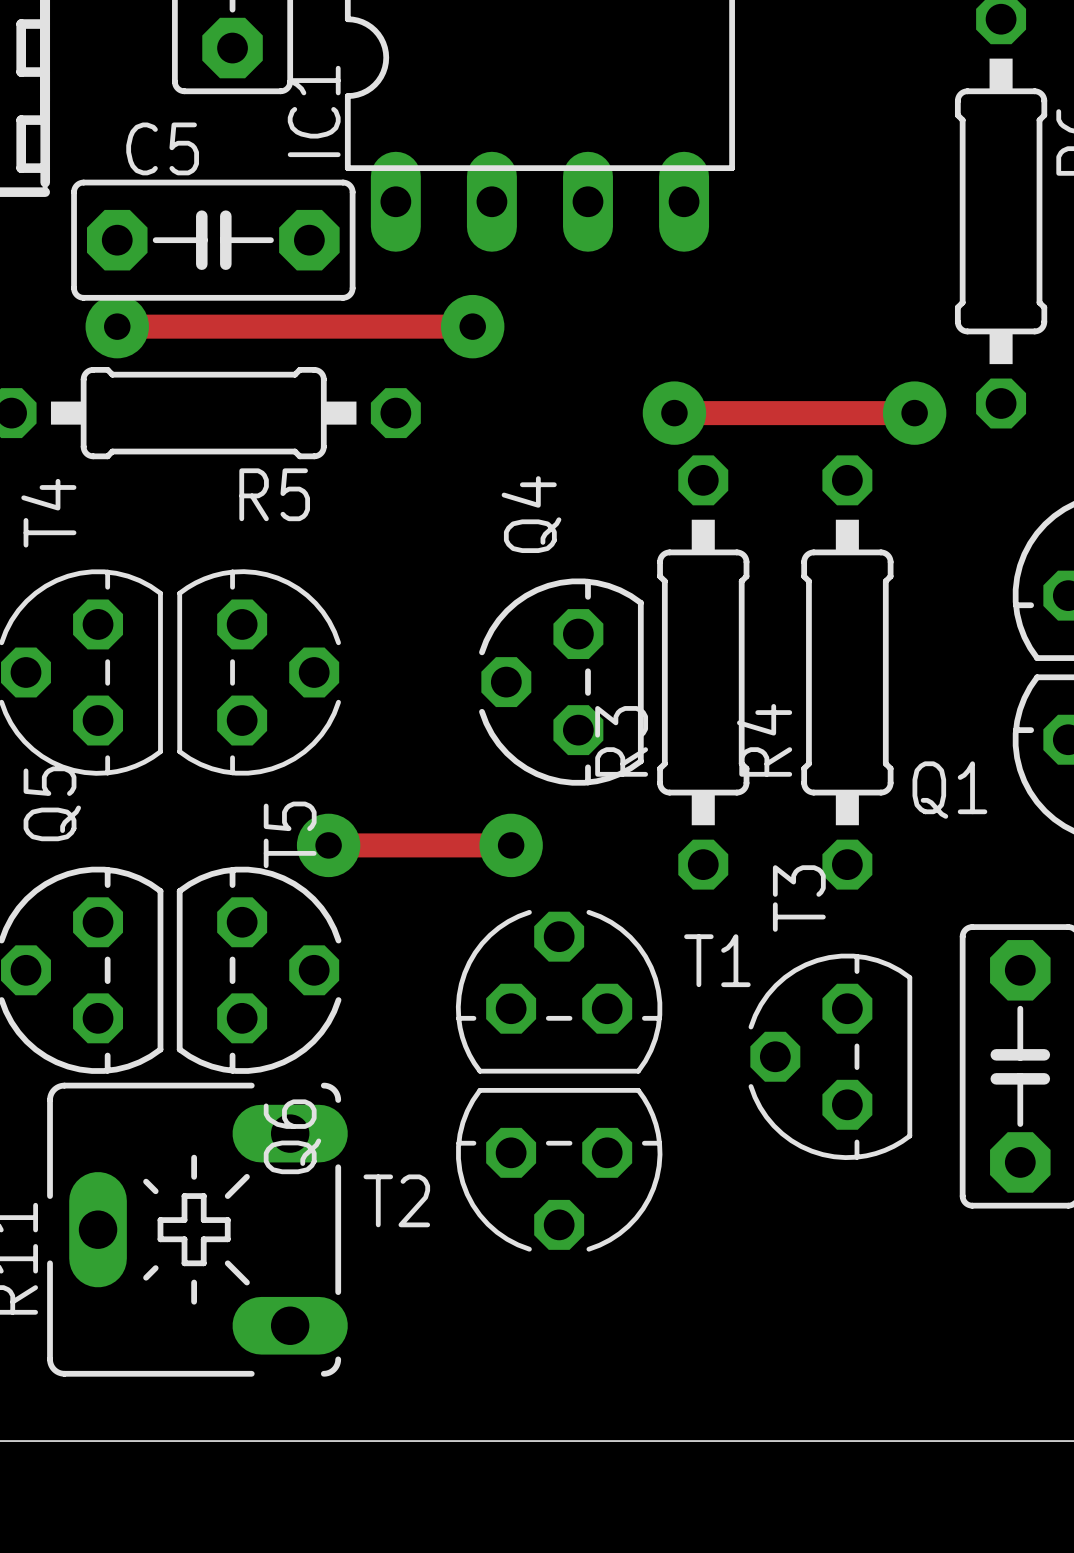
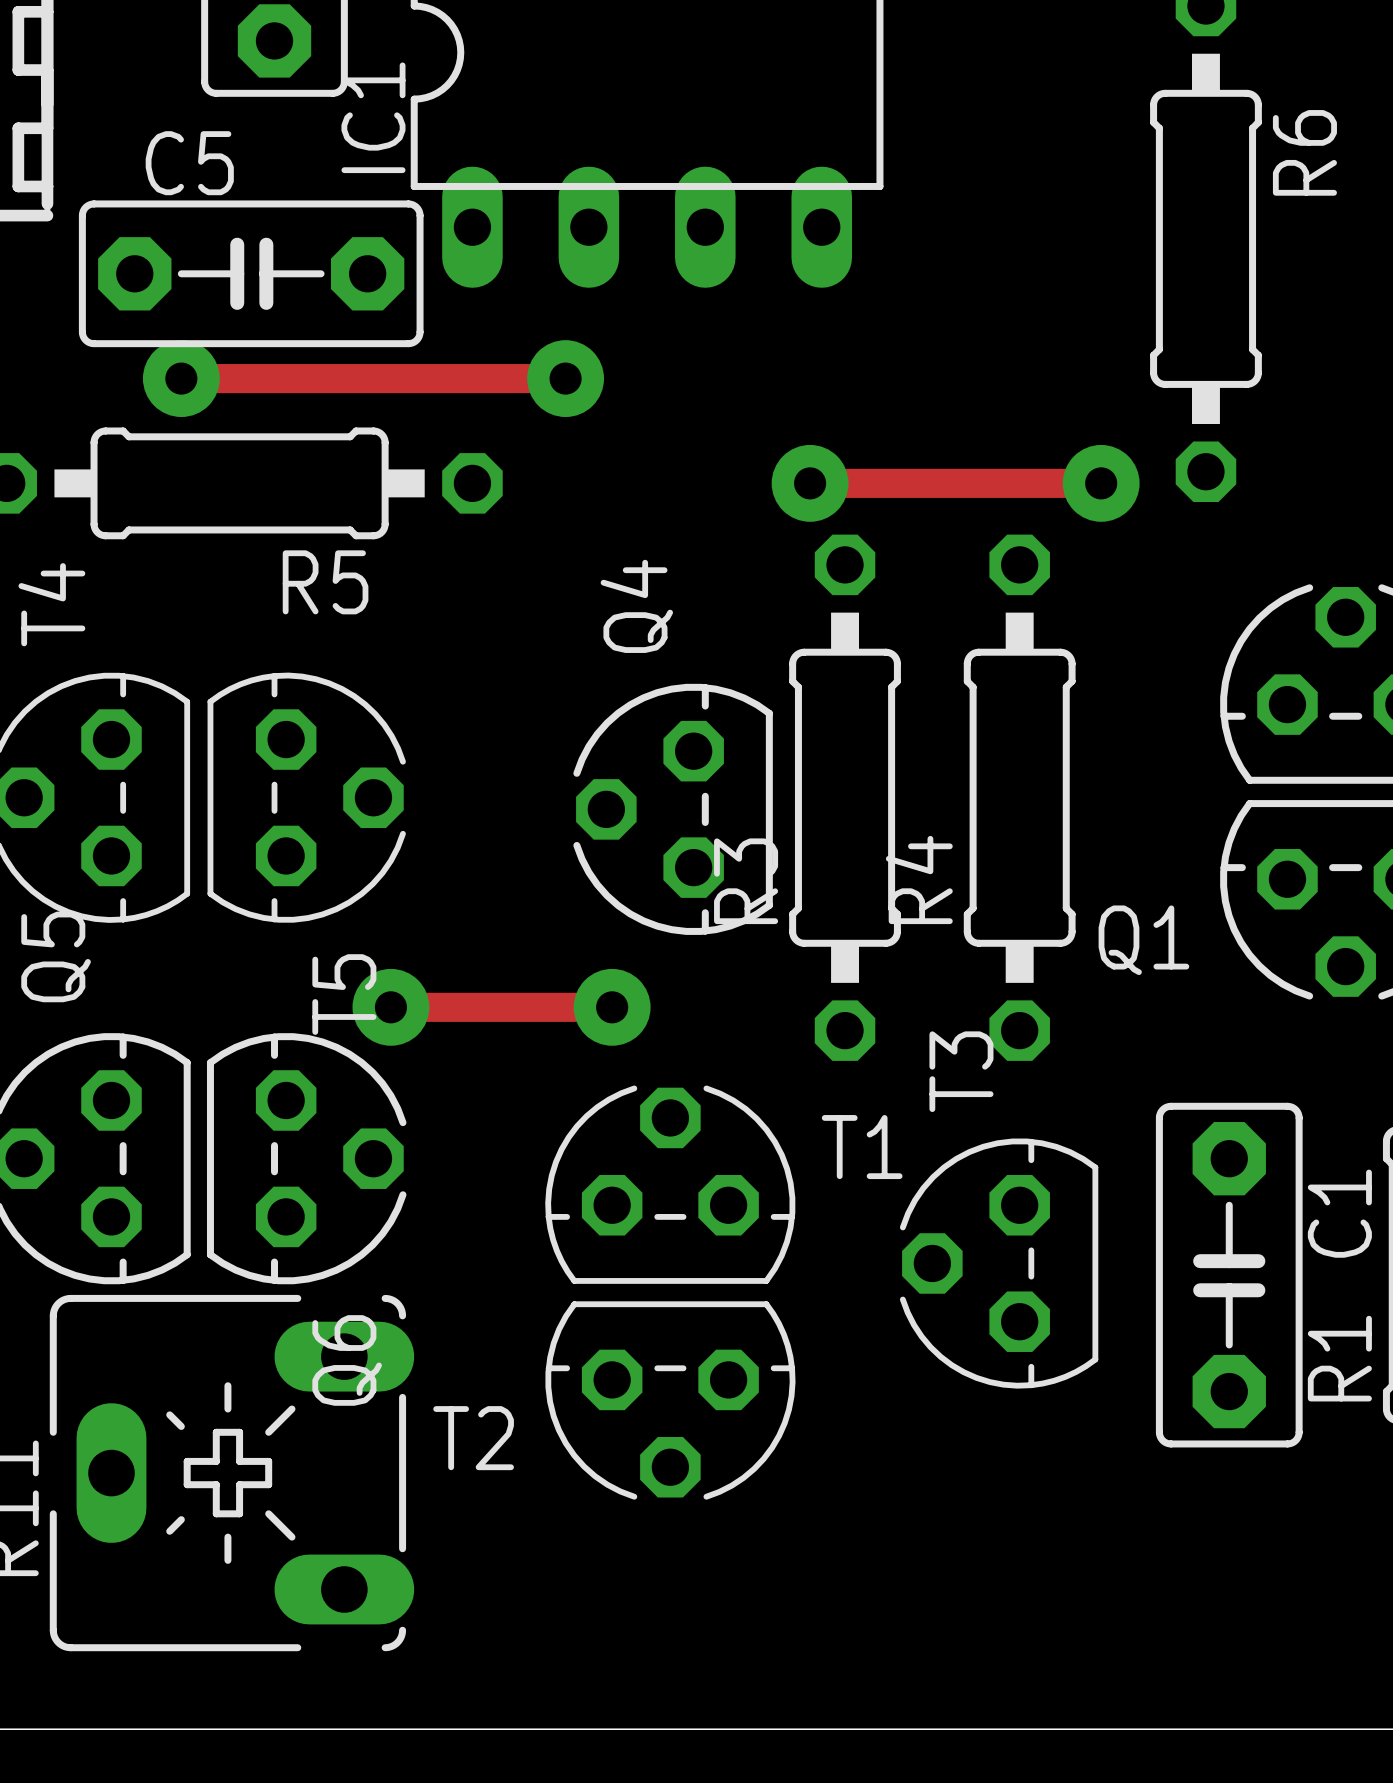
via position: (117, 326) -> (181, 378)

